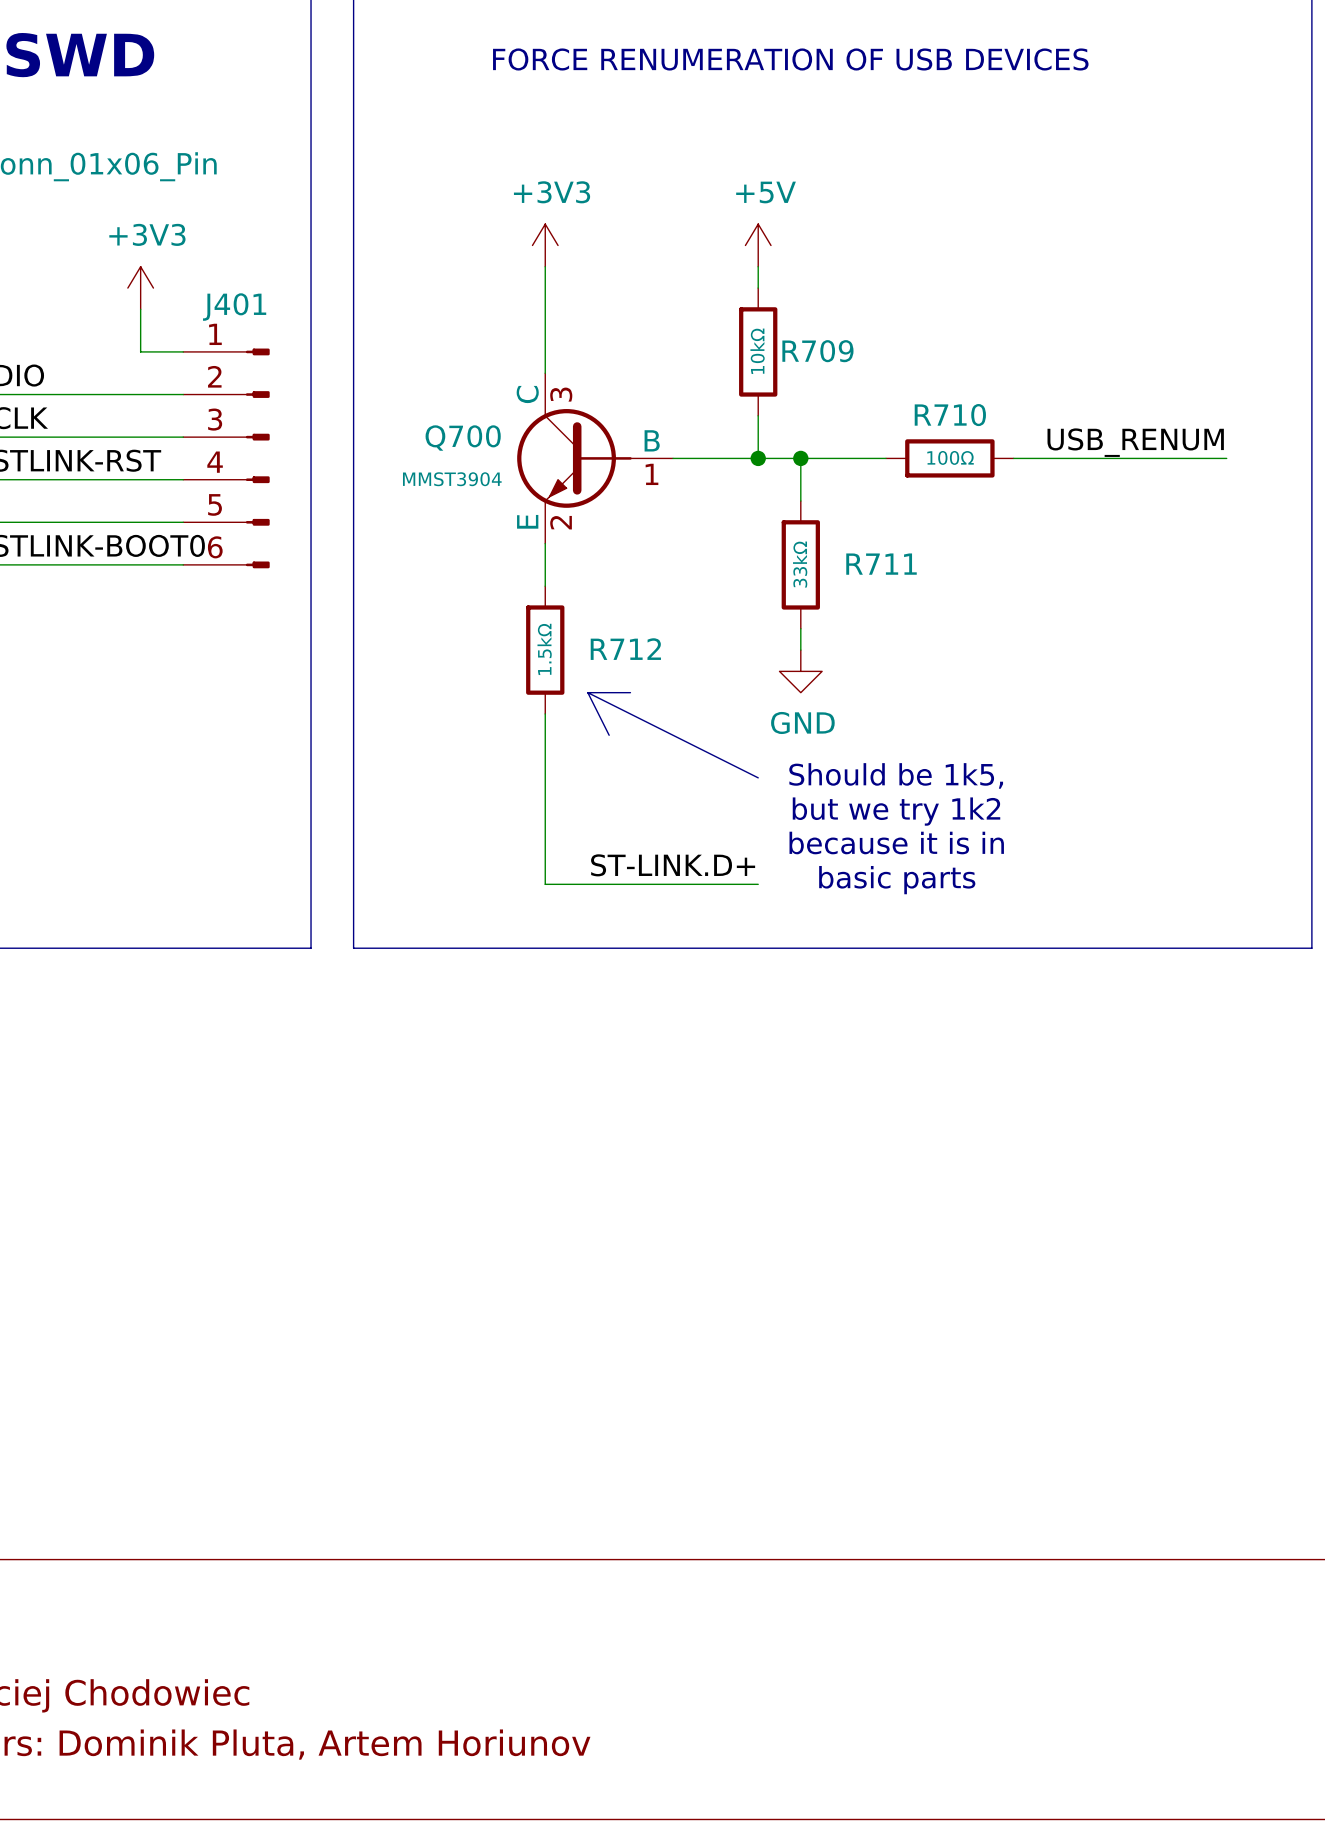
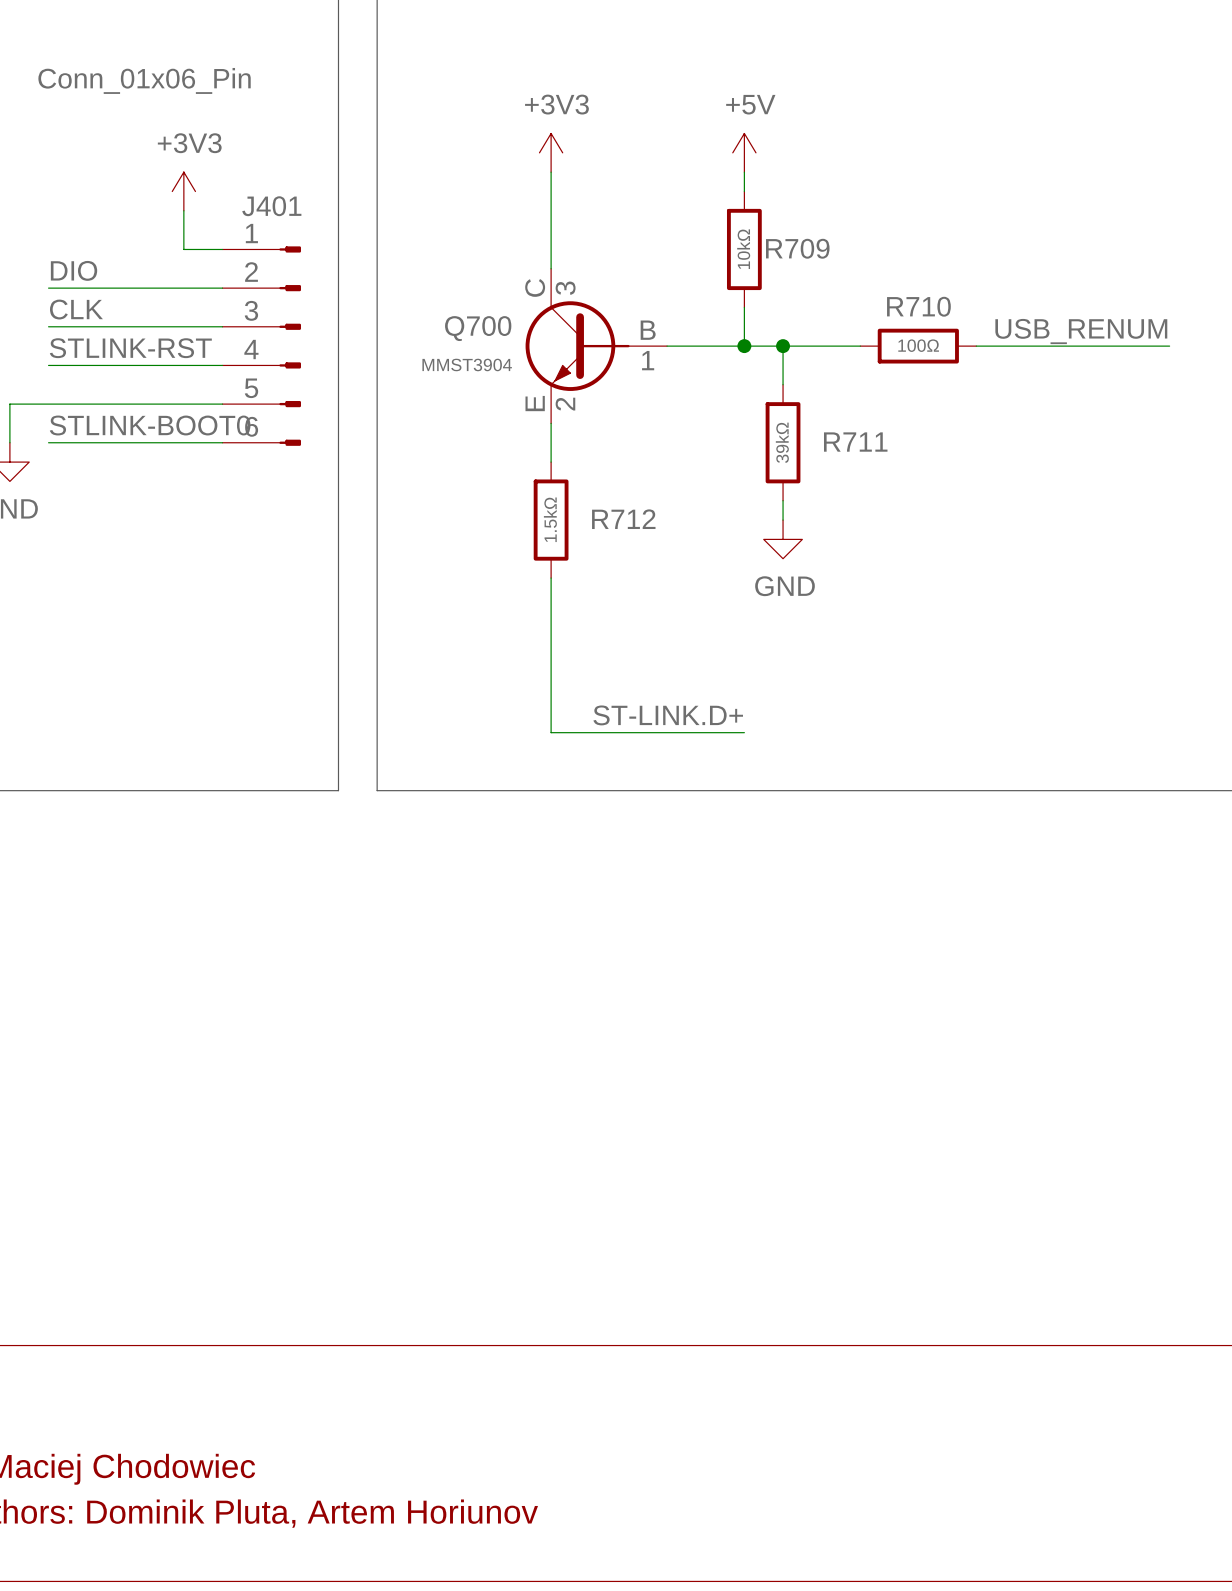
R711 value: 33kΩ (800, 564) -> 39kΩ (782, 442)
line: (587, 692) (758, 777) -> none
line: (587, 692) (609, 735) -> none
line: (587, 692) (630, 692) -> none
text: Should be 1k5, (896, 775) -> none
text: but we try 1k2 (896, 811) -> none
text: because it is in (896, 843) -> none
text: basic parts (897, 880) -> none

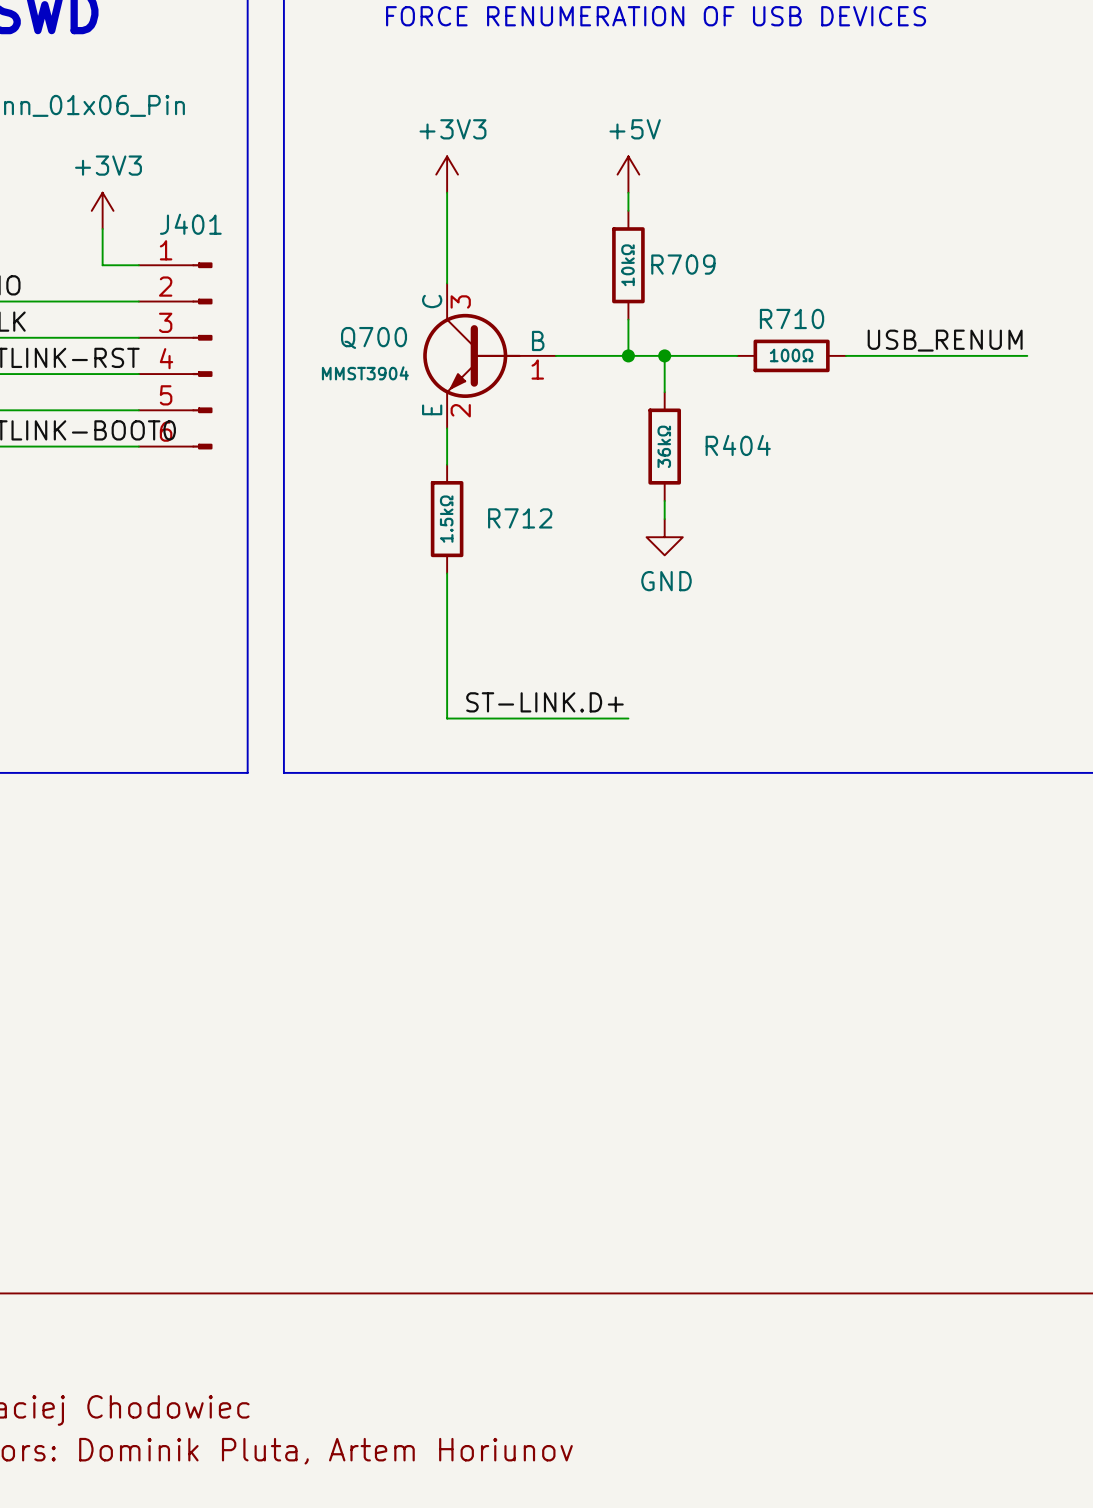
R711 value: 39kΩ (782, 442) -> 36kΩ (664, 446)
R711 name: R711 (855, 442) -> R404 (738, 445)

